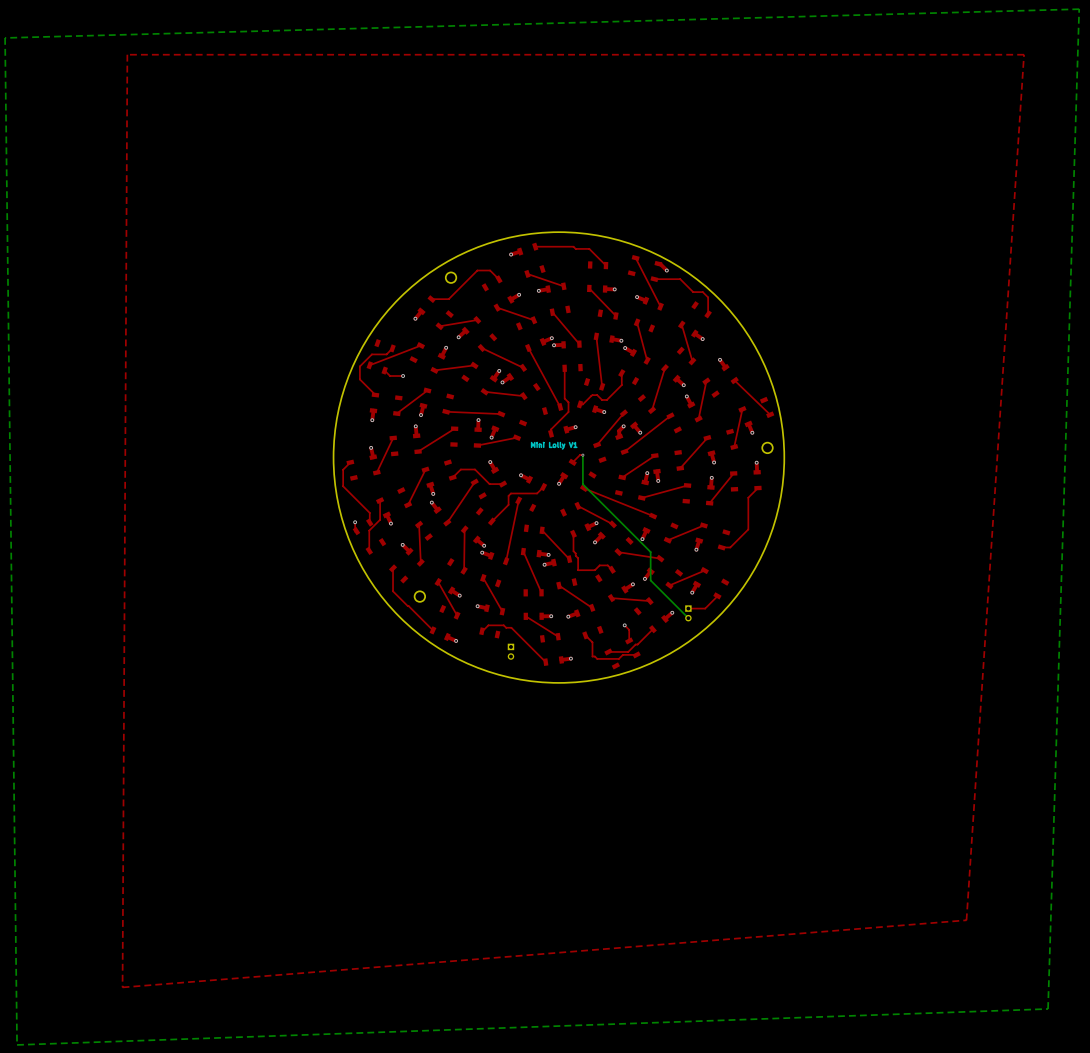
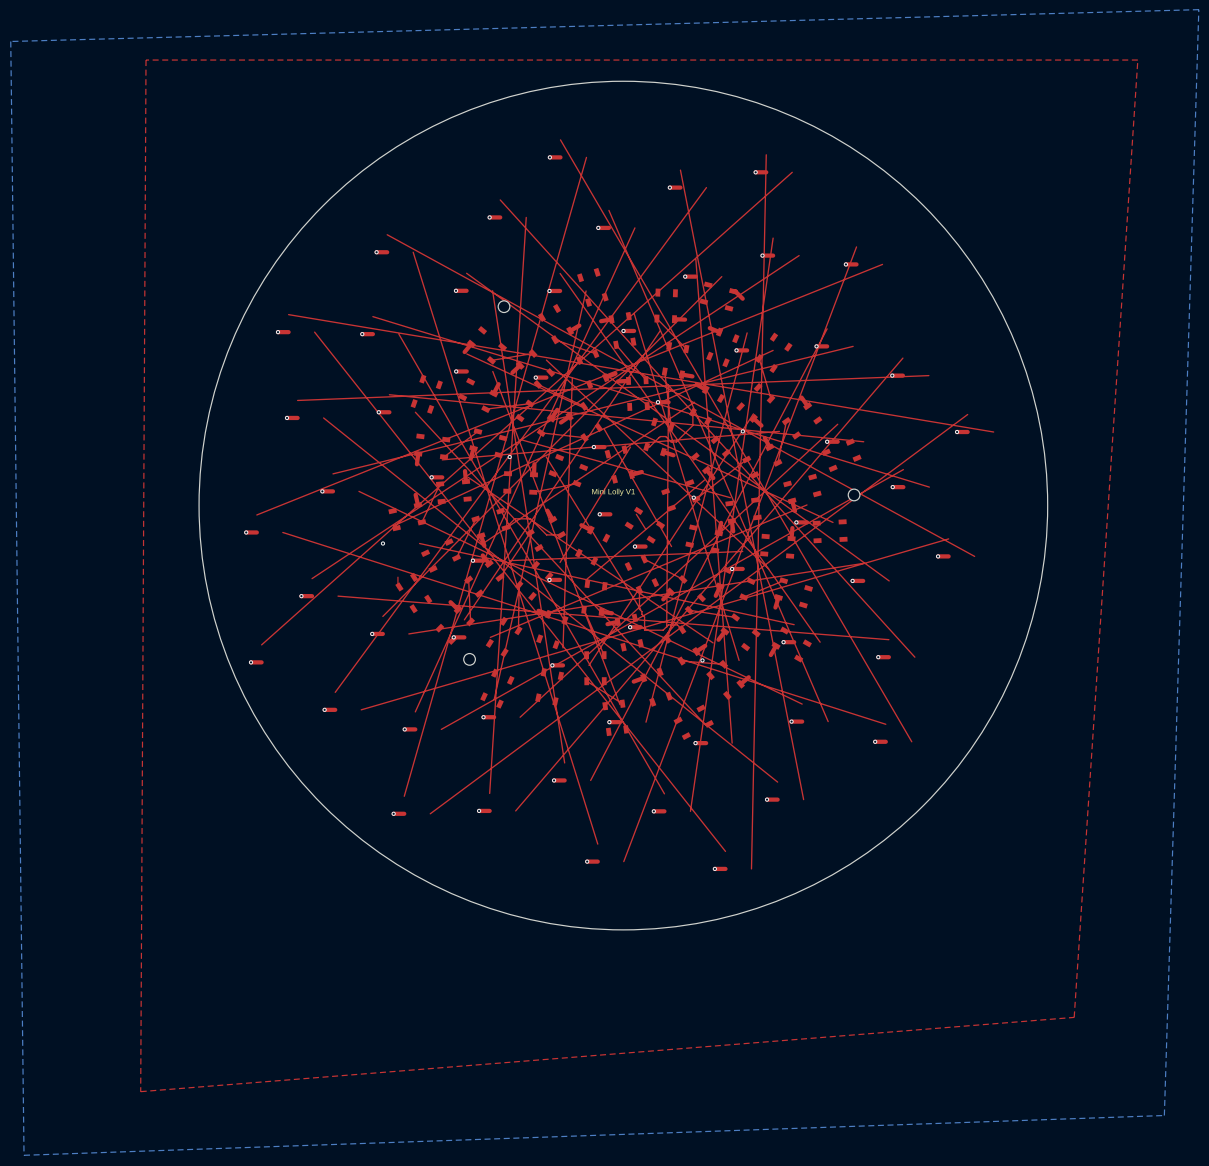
top track: none -> (560, 139) (911, 741)
top track: none -> (766, 154) (751, 868)
via: none -> (549, 157)
top track: none -> (560, 157) (549, 157)
top track: none -> (586, 157) (404, 796)
top track: none -> (680, 170) (803, 799)
via: none -> (755, 172)
top track: none -> (766, 172) (755, 172)
top track: none -> (792, 172) (261, 644)
via: none -> (669, 187)
top track: none -> (680, 187) (669, 187)
top track: none -> (706, 187) (335, 692)
top track: none -> (500, 199) (914, 657)
top track: none -> (608, 210) (828, 721)
via: none -> (489, 217)
top track: none -> (500, 217) (489, 217)
top track: none -> (526, 217) (489, 793)
via: none -> (598, 227)
top track: none -> (608, 227) (598, 227)
top track: none -> (634, 227) (415, 711)
top track: none -> (387, 234) (974, 556)
top track: none -> (773, 238) (690, 811)
top track: none -> (856, 246) (623, 861)
via: none -> (376, 252)
top track: none -> (387, 252) (376, 252)
top track: none -> (413, 252) (597, 844)
via: none -> (762, 255)
top track: none -> (773, 255) (762, 255)
top track: none -> (799, 255) (312, 578)
round board edge size: [333, 232, 785, 684] -> [198, 81, 1048, 931]
top track: none -> (695, 259) (732, 743)
via: none -> (845, 264)
top track: none -> (856, 264) (845, 264)
top track: none -> (882, 264) (256, 514)
top track: (535, 246) (573, 246) (575, 248) (589, 248) (605, 265) -> none
top track: none -> (466, 273) (889, 580)
top track: none -> (560, 273) (820, 642)
via: none -> (685, 276)
top track: none -> (695, 276) (685, 276)
top track: none -> (721, 276) (382, 616)
top track: (520, 251) (511, 254) -> none
via: (511, 254) -> none
top track: (635, 257) (660, 306) -> none
via: none -> (455, 290)
top track: none -> (466, 290) (455, 290)
top track: none -> (492, 290) (564, 762)
via: none -> (549, 290)
top track: none -> (560, 290) (549, 290)
top track: none -> (586, 290) (494, 699)
via: (666, 270) -> none
top track: (527, 273) (563, 286) -> none
top track: (498, 279) (490, 270) (477, 270) (448, 299) (431, 299) -> none
top track: (654, 279) (680, 279) (693, 292) (702, 292) (708, 297) (708, 314) -> none
top track: none -> (634, 313) (739, 660)
top track: none -> (288, 314) (993, 432)
top track: none -> (372, 316) (929, 487)
via: (614, 289) -> none
via: (538, 290) -> none
via: (519, 294) -> none
via: (637, 297) -> none
top track: none -> (827, 328) (590, 780)
via: none -> (623, 330)
top track: none -> (634, 330) (623, 330)
top track: none -> (660, 330) (464, 619)
via: none -> (278, 332)
top track: none -> (288, 332) (278, 332)
top track: none -> (314, 332) (725, 851)
top track: none -> (747, 332) (645, 722)
via: none -> (362, 334)
top track: none -> (372, 334) (362, 334)
top track: none -> (398, 334) (664, 793)
via: none -> (816, 346)
top track: none -> (827, 346) (816, 346)
top track: none -> (853, 346) (332, 473)
via: none -> (736, 350)
top track: none -> (747, 350) (736, 350)
top track: none -> (773, 350) (393, 526)
via position: (415, 318) -> (456, 371)
top track: none -> (466, 353) (833, 522)
top track: (637, 322) (647, 360) -> none
top track: none -> (902, 358) (515, 810)
top track: none -> (546, 360) (768, 568)
top track: (694, 333) (702, 339) -> none
top track: none -> (466, 371) (456, 371)
top track: none -> (492, 371) (619, 704)
via: (458, 337) -> none
via: (551, 338) -> none
via: (702, 339) -> none
via: (621, 340) -> none
via: none -> (892, 375)
top track: none -> (902, 375) (892, 375)
top track: none -> (928, 375) (297, 400)
via: none -> (535, 377)
top track: none -> (546, 377) (535, 377)
top track: none -> (572, 377) (562, 647)
top track: (420, 345) (369, 365) -> none
via: (554, 345) -> none
via: (446, 347) -> none
top track: (392, 348) (386, 354) (371, 354) (359, 366) (359, 379) (375, 394) -> none
top track: (528, 348) (560, 406) -> none
top track: none -> (668, 384) (666, 627)
via: (625, 348) -> none
top track: none -> (389, 394) (863, 441)
via: (720, 359) -> none
via: none -> (657, 402)
top track: none -> (668, 402) (657, 402)
top track: none -> (694, 402) (483, 543)
top track: (564, 368) (564, 398) (568, 402) (568, 411) (551, 429) (551, 433) -> none
top track: (664, 368) (652, 410) -> none
top track: (384, 370) (390, 376) (403, 376) -> none
via: (499, 370) -> none
via: none -> (378, 412)
top track: none -> (389, 412) (378, 412)
top track: none -> (415, 412) (706, 725)
top track: none -> (753, 413) (588, 665)
top track: none -> (967, 414) (430, 813)
via: (403, 376) -> none
via: none -> (287, 417)
top track: none -> (297, 417) (287, 417)
top track: none -> (323, 417) (777, 782)
top track: (734, 380) (770, 414) -> none
via: (502, 382) -> none
top track: none -> (837, 424) (520, 717)
via: (683, 385) -> none
top track: none -> (604, 429) (671, 546)
via: none -> (742, 431)
top track: none -> (779, 431) (442, 459)
via: none -> (957, 432)
top track: none -> (967, 432) (957, 432)
via: (686, 396) -> none
top track: none -> (520, 439) (730, 497)
via: none -> (827, 441)
top track: none -> (837, 441) (827, 441)
via: none -> (593, 447)
top track: none -> (604, 447) (593, 447)
top track: none -> (630, 447) (560, 562)
top track: (742, 409) (734, 447) -> none
top track: (446, 411) (501, 414) -> none
via: (604, 412) -> none
via: none -> (509, 457)
top track: none -> (546, 457) (640, 609)
top track: (623, 413) (597, 444) -> none
via: (421, 415) -> none
via: (372, 420) -> none
via: (478, 420) -> none
top track: (748, 423) (752, 432) -> none
top track: none -> (903, 469) (441, 729)
via: (415, 426) -> none
top track: (623, 426) (619, 430) (619, 436) -> none
via: (623, 426) -> none
via: (575, 427) -> none
top track: (454, 428) (418, 451) -> none
top track: (495, 428) (491, 437) -> none
via: none -> (431, 477)
top track: none -> (442, 477) (431, 477)
top track: none -> (468, 477) (713, 642)
via: (640, 432) -> none
via: (752, 432) -> none
top track: none -> (704, 480) (586, 579)
via: (491, 437) -> none
top track: (707, 437) (680, 468) -> none
via: none -> (892, 487)
top track: none -> (903, 487) (892, 487)
via: none -> (322, 491)
top track: none -> (332, 491) (322, 491)
top track: none -> (358, 491) (802, 704)
via: (371, 447) -> none
via: none -> (693, 497)
top track: (582, 455) (579, 455) (572, 462) -> none
bottom track: (582, 455) (582, 484) (650, 552) (650, 580) (688, 618) -> none
via: (582, 455) -> none
top track: (654, 455) (622, 477) -> none
top track: none -> (807, 504) (490, 637)
top track: (350, 462) (343, 469) (343, 486) (369, 512) (369, 522) -> none
via: (490, 462) -> none
via: (714, 462) -> none
top track: (756, 462) (757, 472) -> none
via: (756, 462) -> none
via: none -> (599, 514)
top track: none -> (610, 514) (599, 514)
top track: none -> (636, 514) (645, 529)
via: none -> (796, 522)
top track: none -> (807, 522) (796, 522)
via: (647, 473) -> none
top track: (733, 473) (709, 503) -> none
via: (521, 475) -> none
top track: (564, 475) (559, 483) -> none
via: (711, 477) -> none
via: (658, 480) -> none
via: none -> (246, 532)
top track: none -> (256, 532) (246, 532)
top track: none -> (282, 532) (885, 724)
via: (559, 483) -> none
top track: (687, 485) (641, 497) -> none
top track: (543, 487) (537, 493) (510, 493) (508, 495) (508, 504) (491, 521) -> none
top track: none -> (948, 538) (361, 709)
top track: (584, 488) (653, 516) -> none
top track: (757, 488) (748, 497) (748, 529) (730, 547) (721, 547) -> none
via: none -> (382, 543)
top track: none -> (419, 543) (794, 624)
via: (433, 493) -> none
via: none -> (634, 546)
top track: none -> (645, 546) (634, 546)
top track: none -> (742, 551) (509, 560)
top track: (380, 500) (380, 519) (369, 530) (369, 550) -> none
top track: (518, 500) (506, 561) -> none
via: (431, 502) -> none
via: none -> (938, 556)
top track: none -> (948, 556) (938, 556)
via: none -> (472, 560)
top track: none -> (483, 560) (472, 560)
top track: none -> (863, 563) (408, 633)
top track: (386, 514) (390, 523) -> none
via: none -> (732, 568)
top track: none -> (742, 568) (732, 568)
via: (355, 522) -> none
via: (390, 523) -> none
top track: (596, 523) (587, 527) -> none
via: (596, 523) -> none
via: none -> (549, 579)
top track: none -> (560, 579) (549, 579)
via: none -> (852, 580)
top track: none -> (863, 580) (852, 580)
top track: (542, 530) (569, 559) -> none
via: none -> (301, 596)
top track: none -> (312, 596) (301, 596)
top track: none -> (338, 596) (888, 639)
top track: (476, 539) (484, 545) -> none
via: (642, 539) -> none
via: (595, 542) -> none
via: (402, 544) -> none
via: (484, 545) -> none
via: (696, 549) -> none
via: (482, 552) -> none
via: (548, 554) -> none
via: (544, 564) -> none
via: none -> (630, 627)
top track: none -> (640, 627) (630, 627)
top track: (393, 568) (393, 591) (432, 630) -> none
top track: (704, 570) (669, 585) -> none
via: none -> (372, 633)
top track: none -> (382, 633) (372, 633)
via: none -> (453, 637)
top track: none -> (464, 637) (453, 637)
top track: (483, 578) (502, 611) -> none
via: (644, 578) -> none
via: none -> (783, 642)
top track: none -> (794, 642) (783, 642)
top track: (438, 582) (457, 615) -> none
via: (632, 584) -> none
top track: (559, 585) (592, 607) -> none
top track: (451, 590) (459, 595) -> none
via: (692, 592) -> none
via: none -> (878, 657)
top track: none -> (888, 657) (878, 657)
via: (459, 595) -> none
top track: (717, 595) (705, 608) (688, 608) -> none
via: none -> (702, 660)
via: none -> (251, 662)
top track: none -> (261, 662) (251, 662)
top track: none -> (562, 665) (552, 665)
top track: (477, 606) (486, 608) -> none
via position: (477, 606) -> (552, 665)
via: (672, 612) -> none
part: (688, 613) -> none
top track: (551, 616) (541, 616) -> (619, 722) (609, 722)
via: (551, 616) -> none
via: (568, 616) -> none
top track: (624, 625) (629, 629) (629, 640) -> none
via: (624, 625) -> none
top track: (652, 629) (628, 651) (608, 651) -> none
top track: (482, 631) (488, 625) (503, 625) (506, 627) (511, 627) (545, 662) -> none
top track: (585, 635) (592, 642) (592, 656) (597, 658) (618, 658) (622, 654) (636, 654) -> none
top track: (447, 636) (456, 640) -> none
via position: (456, 640) -> (483, 717)
via: none -> (324, 709)
top track: none -> (335, 709) (324, 709)
top track: none -> (494, 717) (483, 717)
part: (510, 651) -> none
via: none -> (791, 721)
top track: none -> (802, 721) (791, 721)
via: none -> (609, 722)
top track: (570, 658) (561, 659) -> none
via: (570, 658) -> none
via: none -> (404, 729)
top track: none -> (415, 729) (404, 729)
via: none -> (875, 741)
top track: none -> (885, 741) (875, 741)
via: none -> (695, 743)
top track: none -> (706, 743) (695, 743)
via: none -> (554, 780)
top track: none -> (564, 780) (554, 780)
via: none -> (767, 799)
top track: none -> (777, 799) (767, 799)
via: none -> (479, 810)
top track: none -> (489, 810) (479, 810)
via: none -> (653, 811)
top track: none -> (664, 811) (653, 811)
via: none -> (393, 813)
top track: none -> (404, 813) (393, 813)
via: none -> (587, 861)
top track: none -> (597, 861) (587, 861)
via: none -> (714, 868)
top track: none -> (725, 868) (714, 868)

